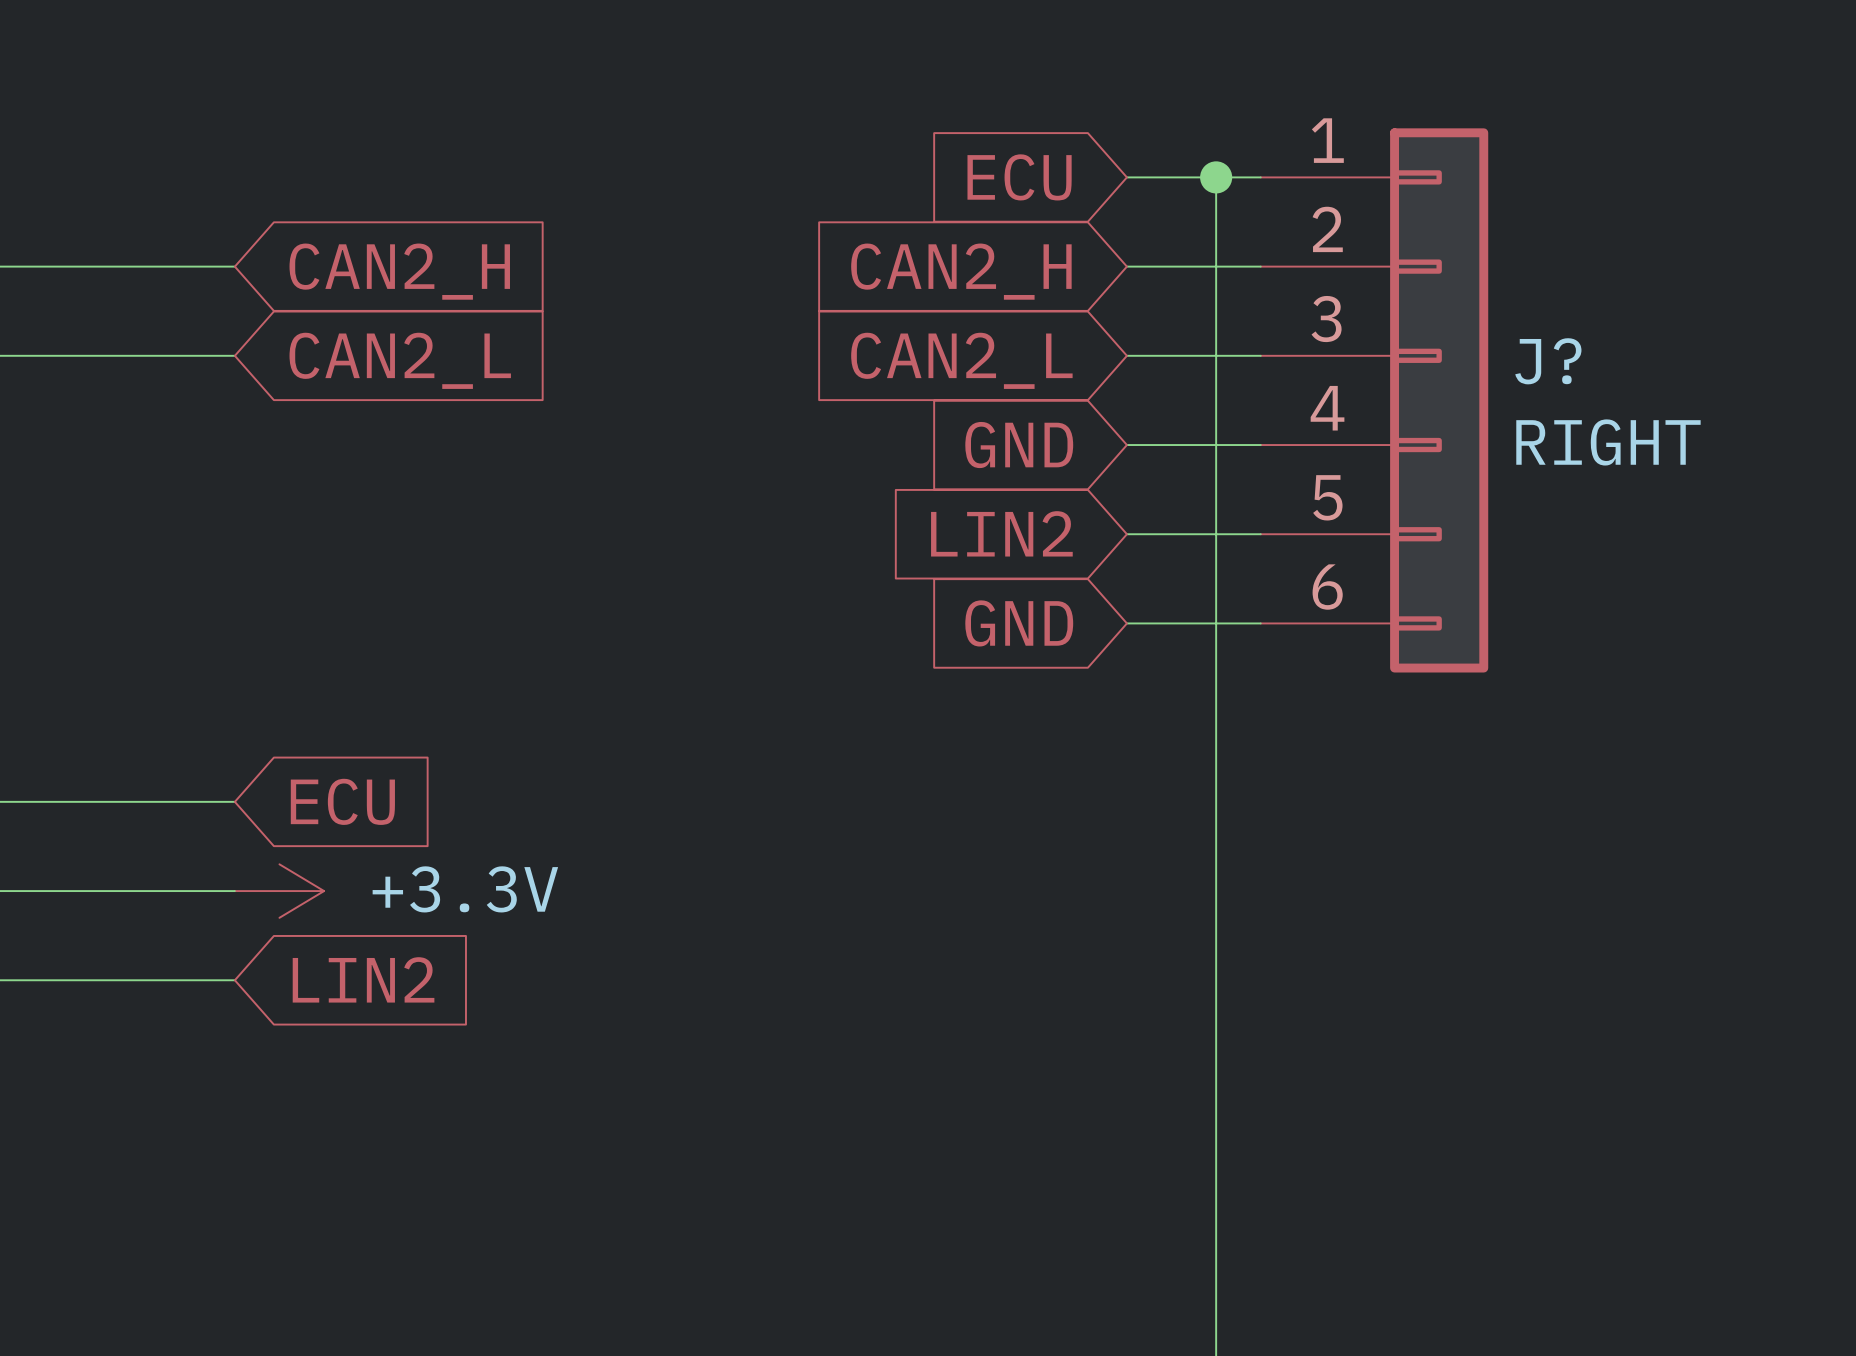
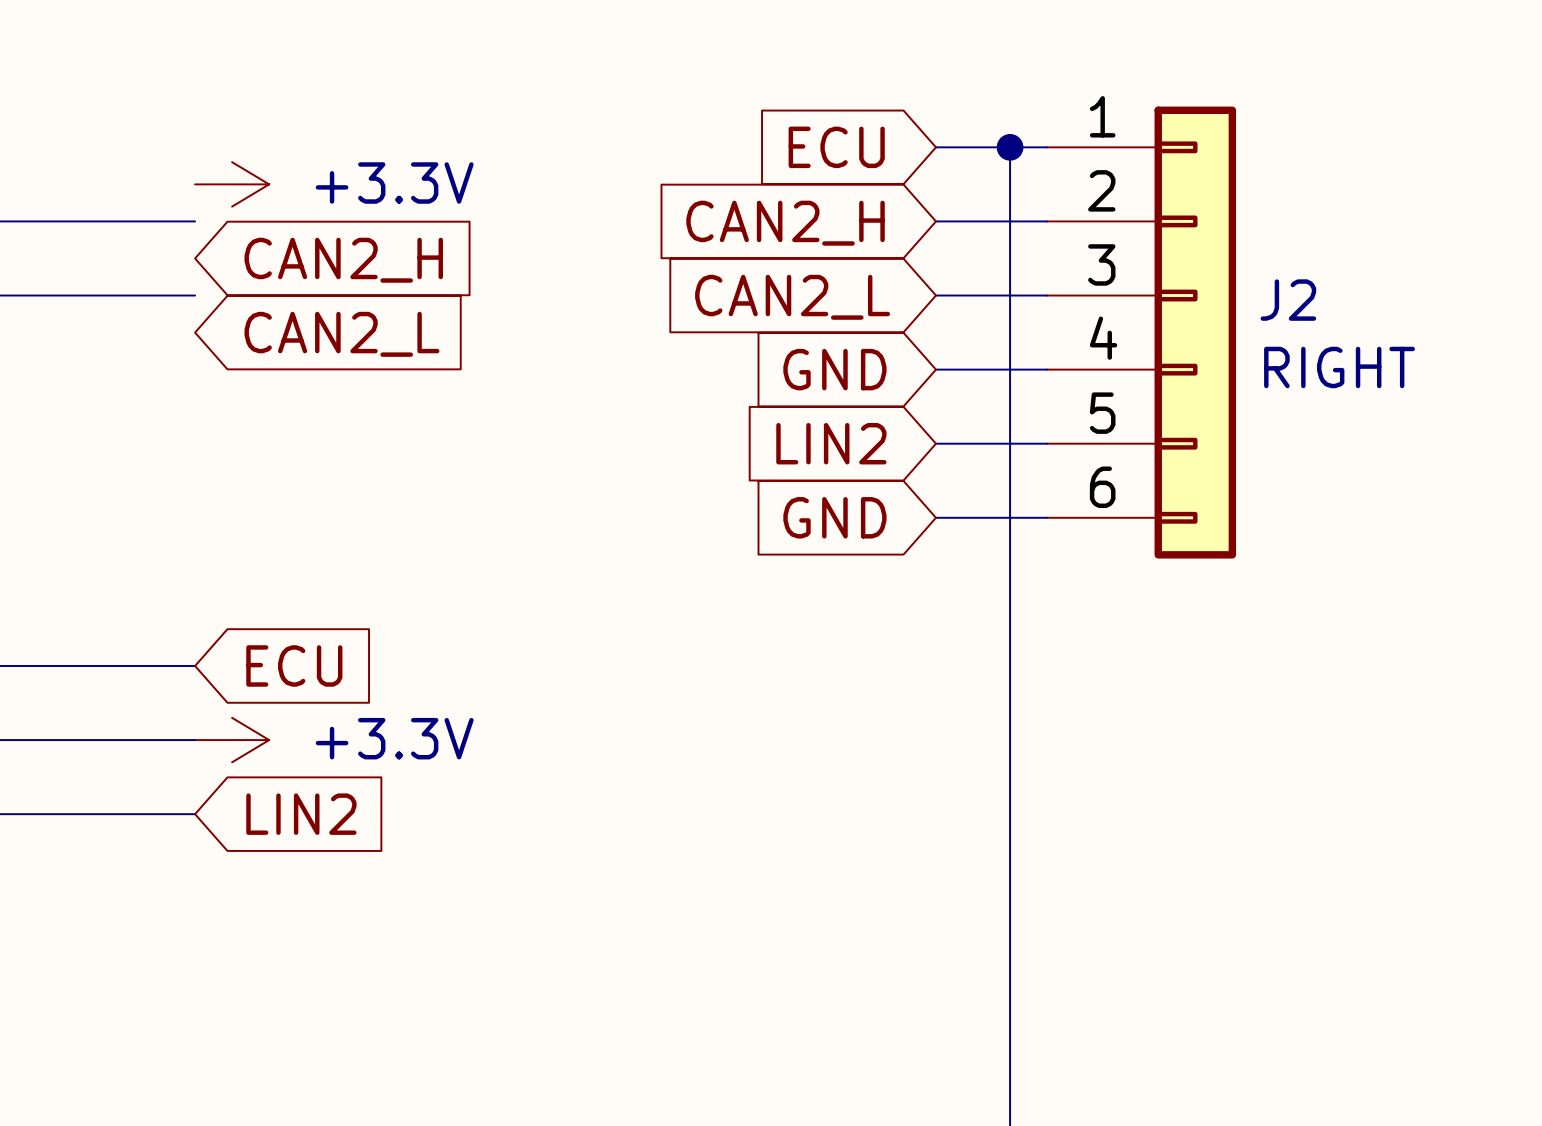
power symbol: none -> +3.3V (232, 184)
global label position: CAN2_H (399, 271) -> CAN2_H (343, 260)
global label position: CAN2_L (400, 360) -> CAN2_L (341, 334)
J? name: J? (1548, 361) -> J2 (1288, 300)

